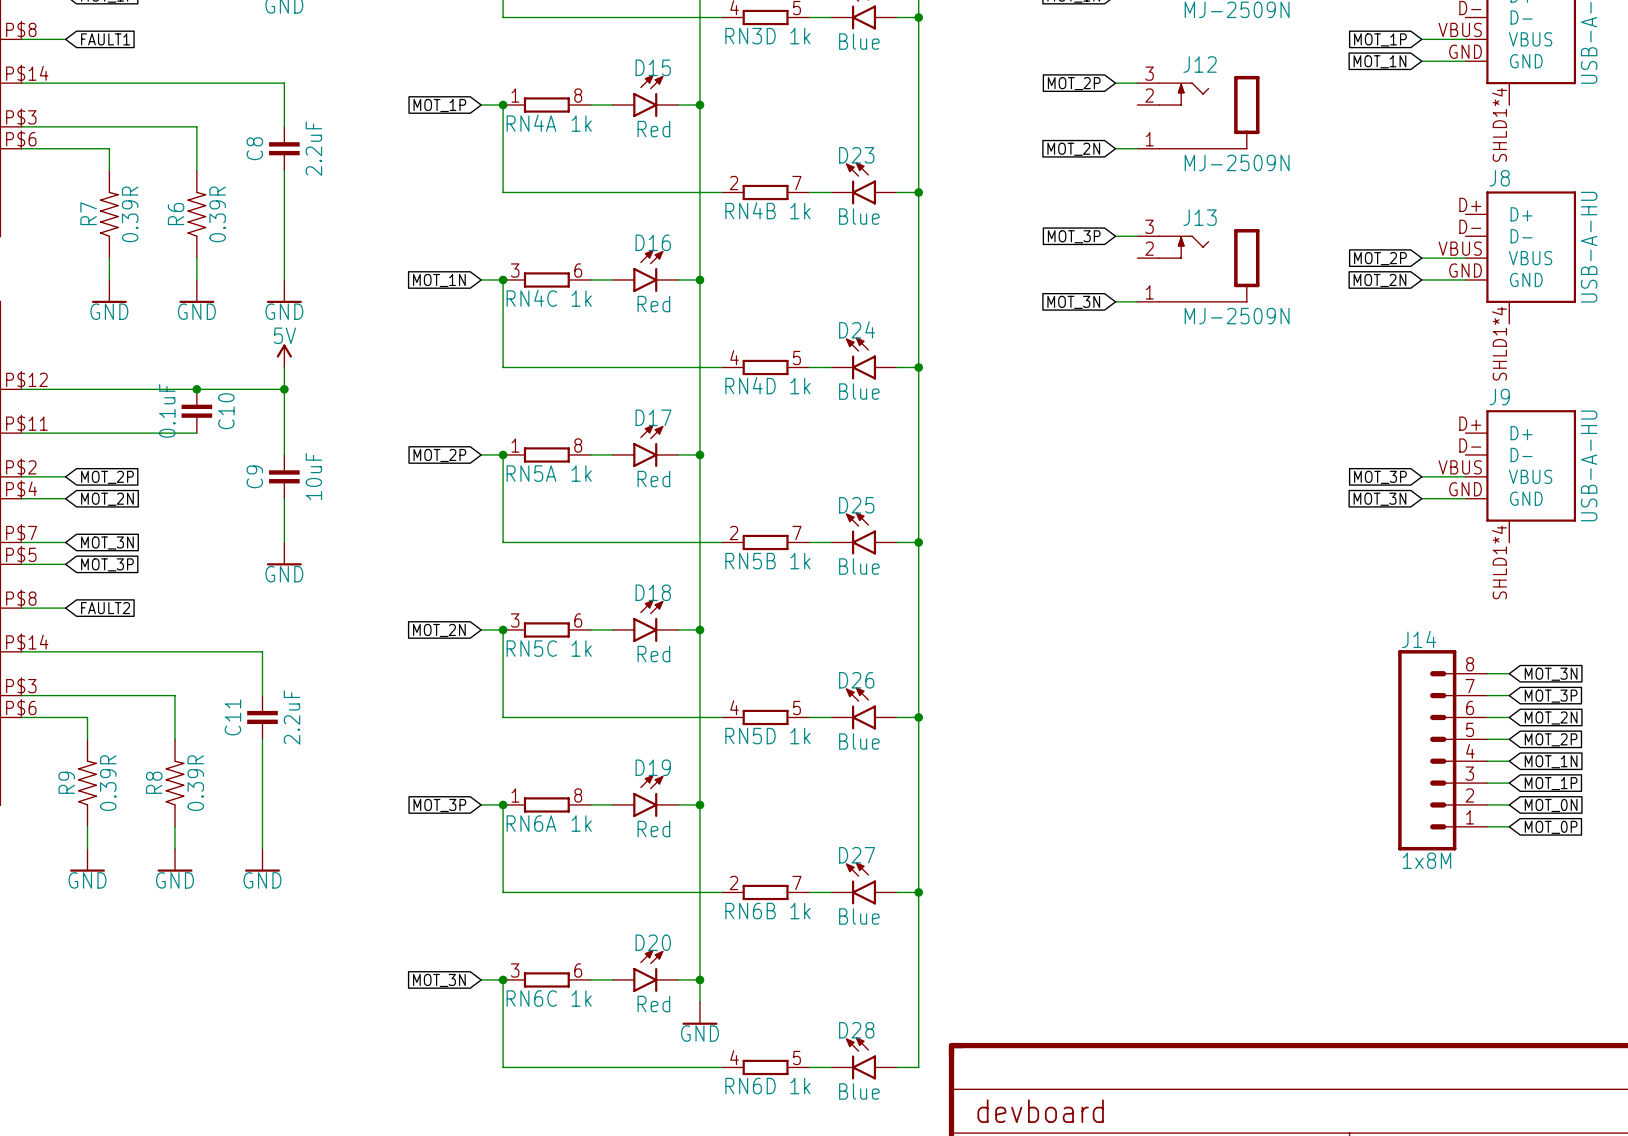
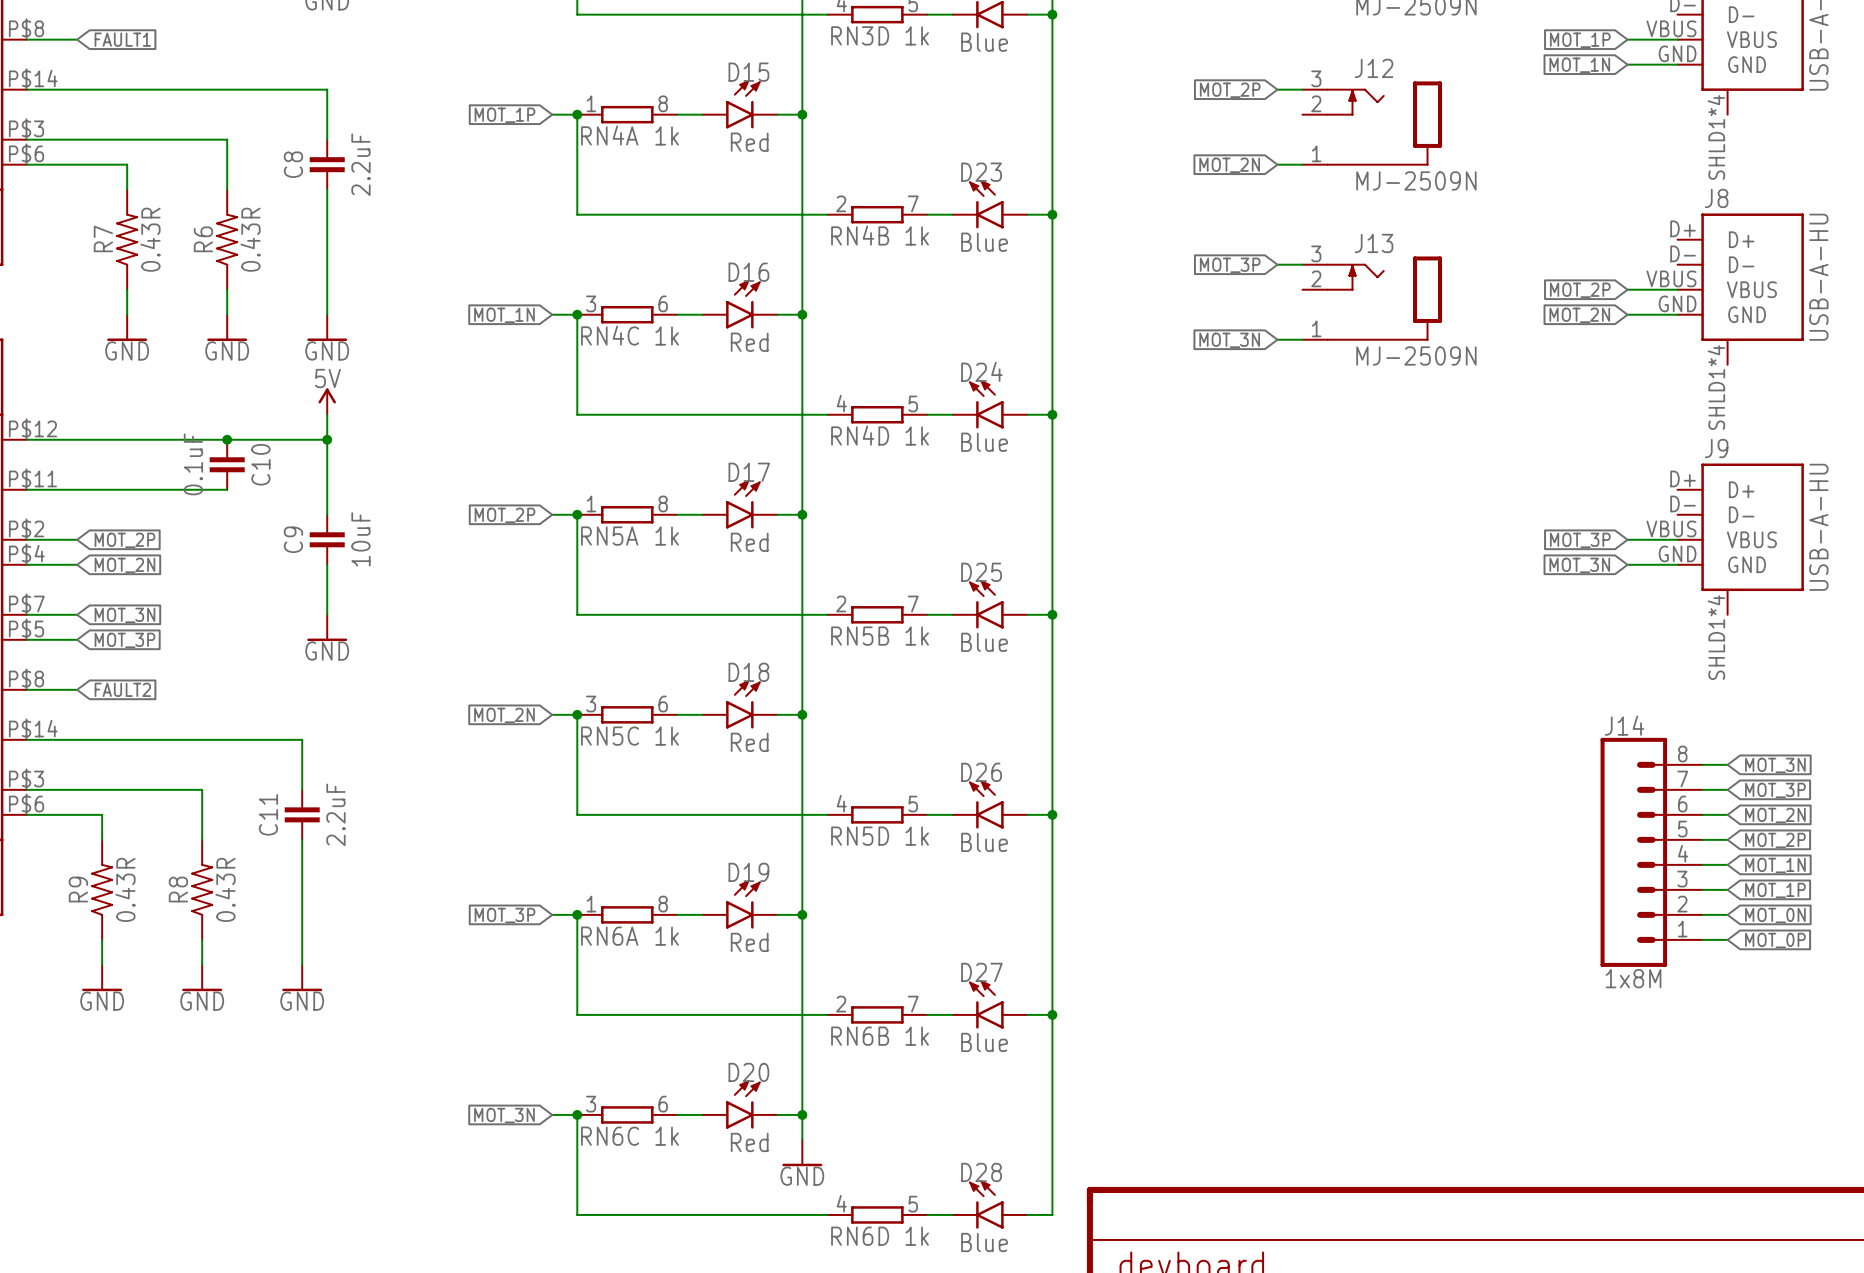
R7 value: 0.39R (130, 214) -> 0.43R (150, 239)
R6 value: 0.39R (217, 214) -> 0.43R (250, 239)
R9 value: 0.39R (108, 783) -> 0.43R (125, 889)
R8 value: 0.39R (195, 783) -> 0.43R (225, 889)

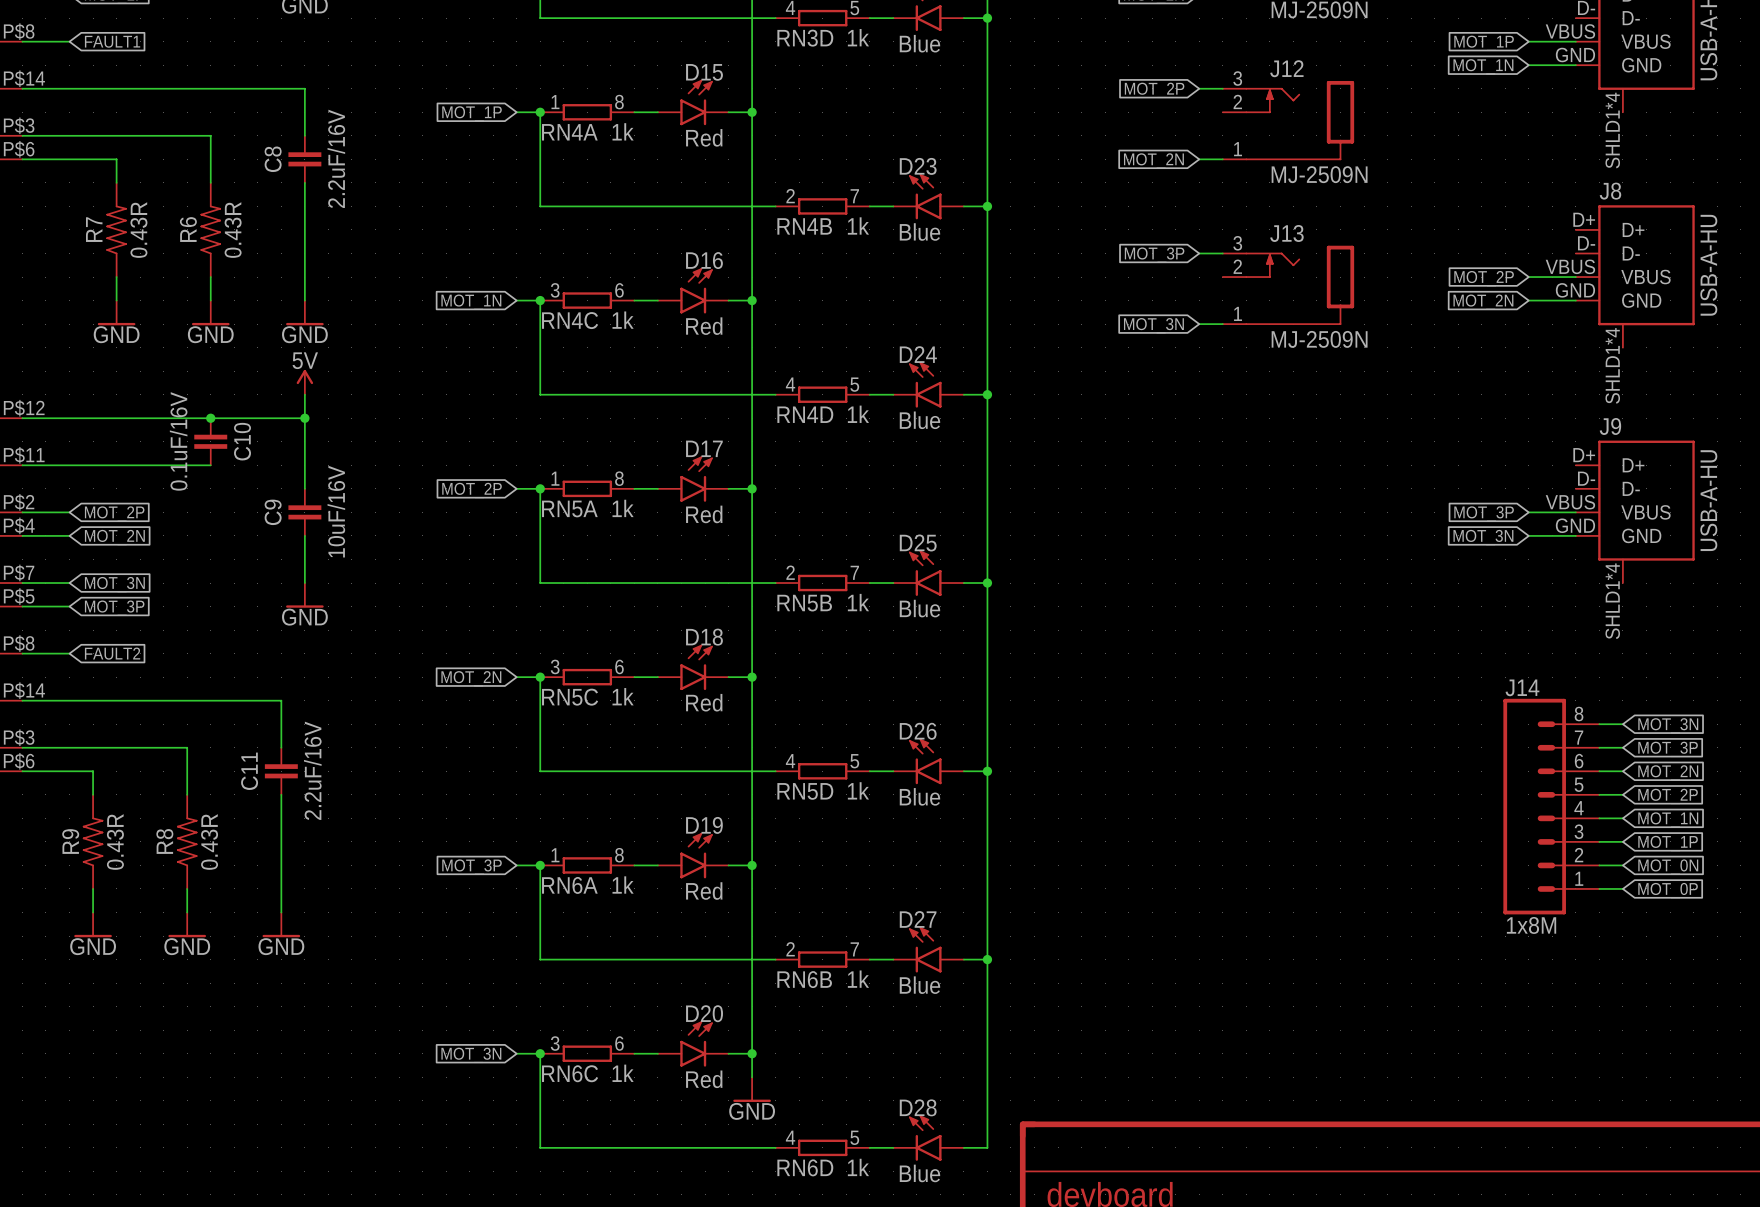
C8 value: 2.2uF (360, 164) -> 2.2uF/16V (336, 158)
C10 value: 0.1uF (193, 464) -> 0.1uF/16V (178, 441)
C9 value: 10uF (360, 539) -> 10uF/16V (336, 511)
C11 value: 2.2uF (335, 814) -> 2.2uF/16V (312, 770)

